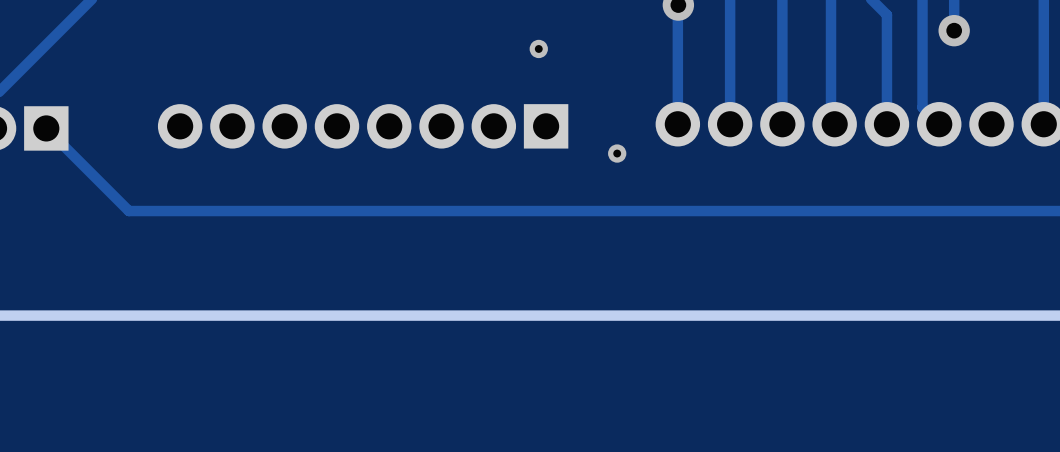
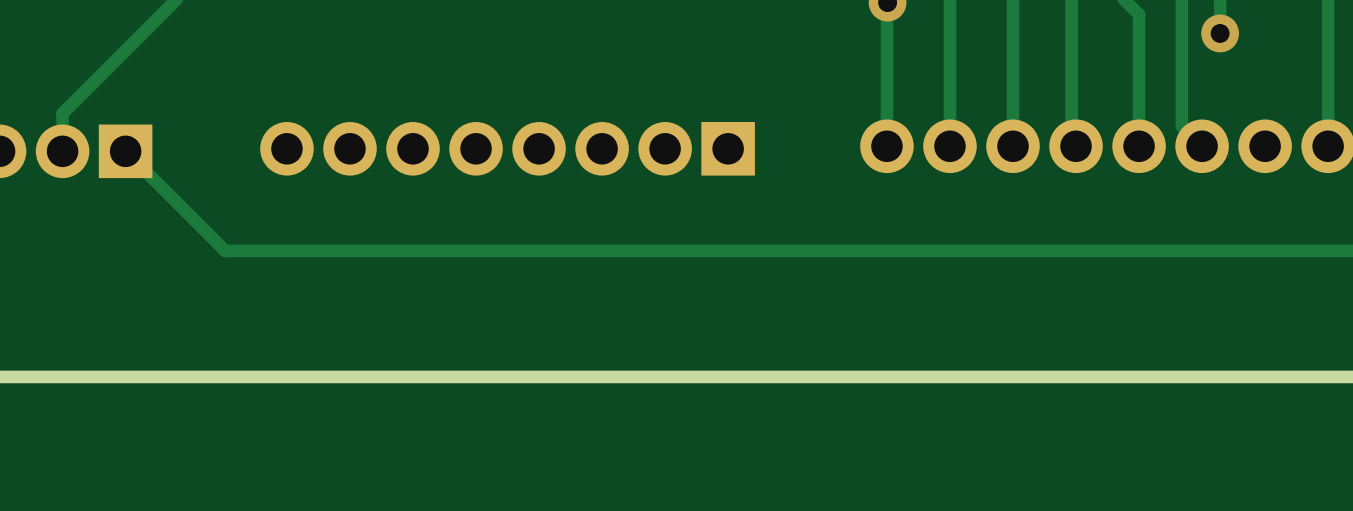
via: (538, 48) -> none
via: (617, 153) -> none

